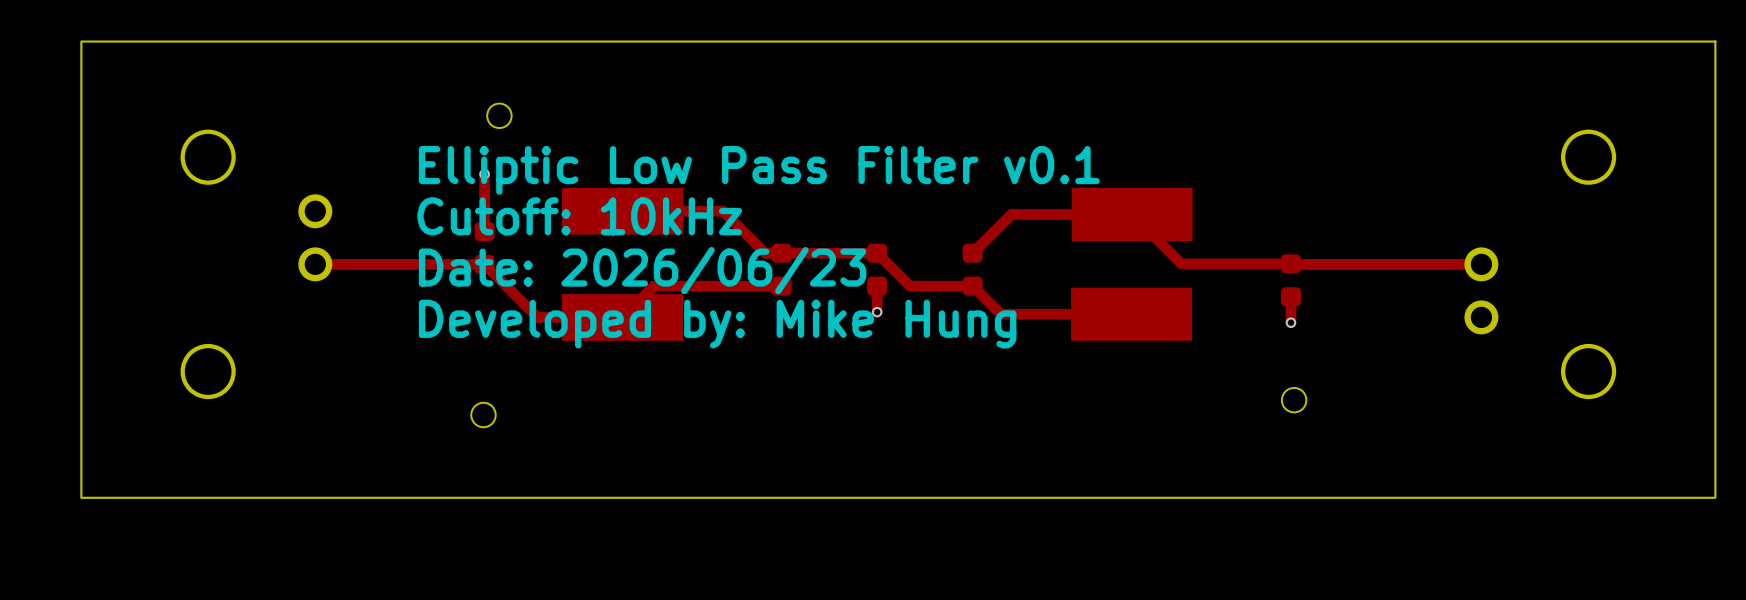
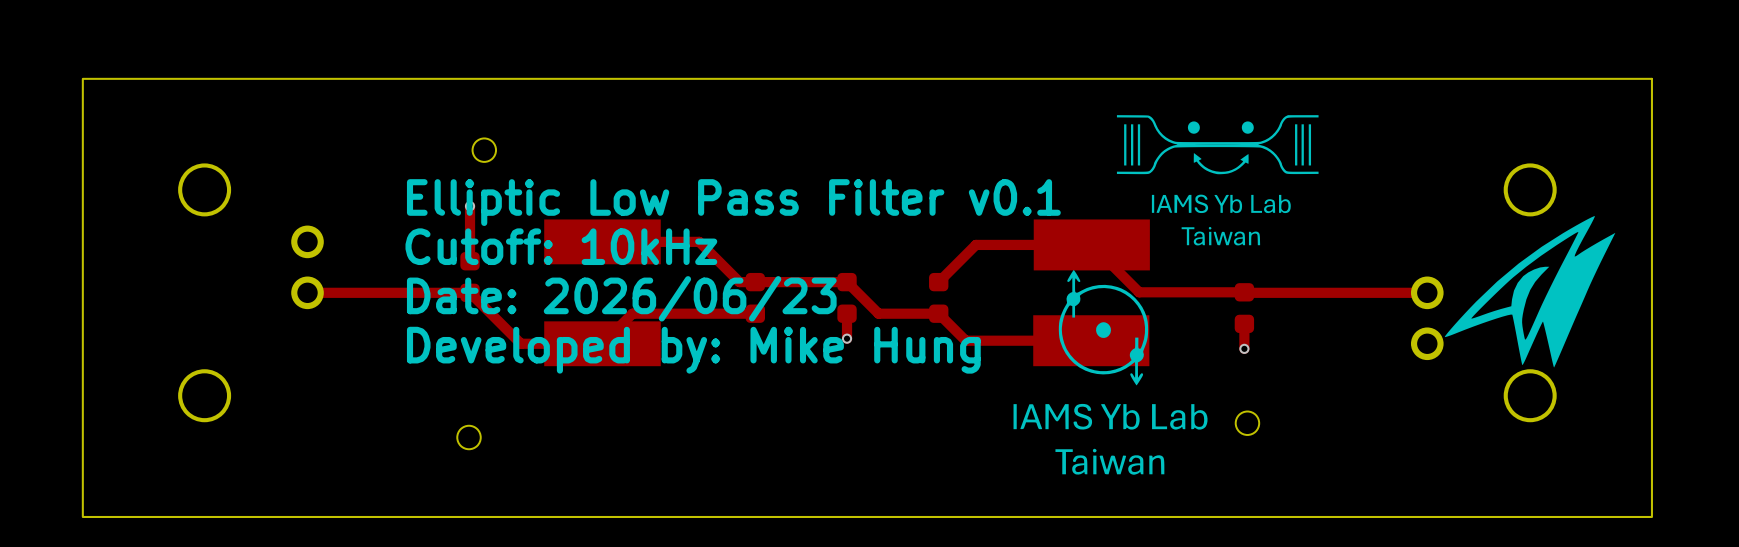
drawing: none -> [1116, 115, 1319, 246]
drawing: none -> [1444, 216, 1616, 368]
drawing: none -> [1013, 270, 1208, 475]

